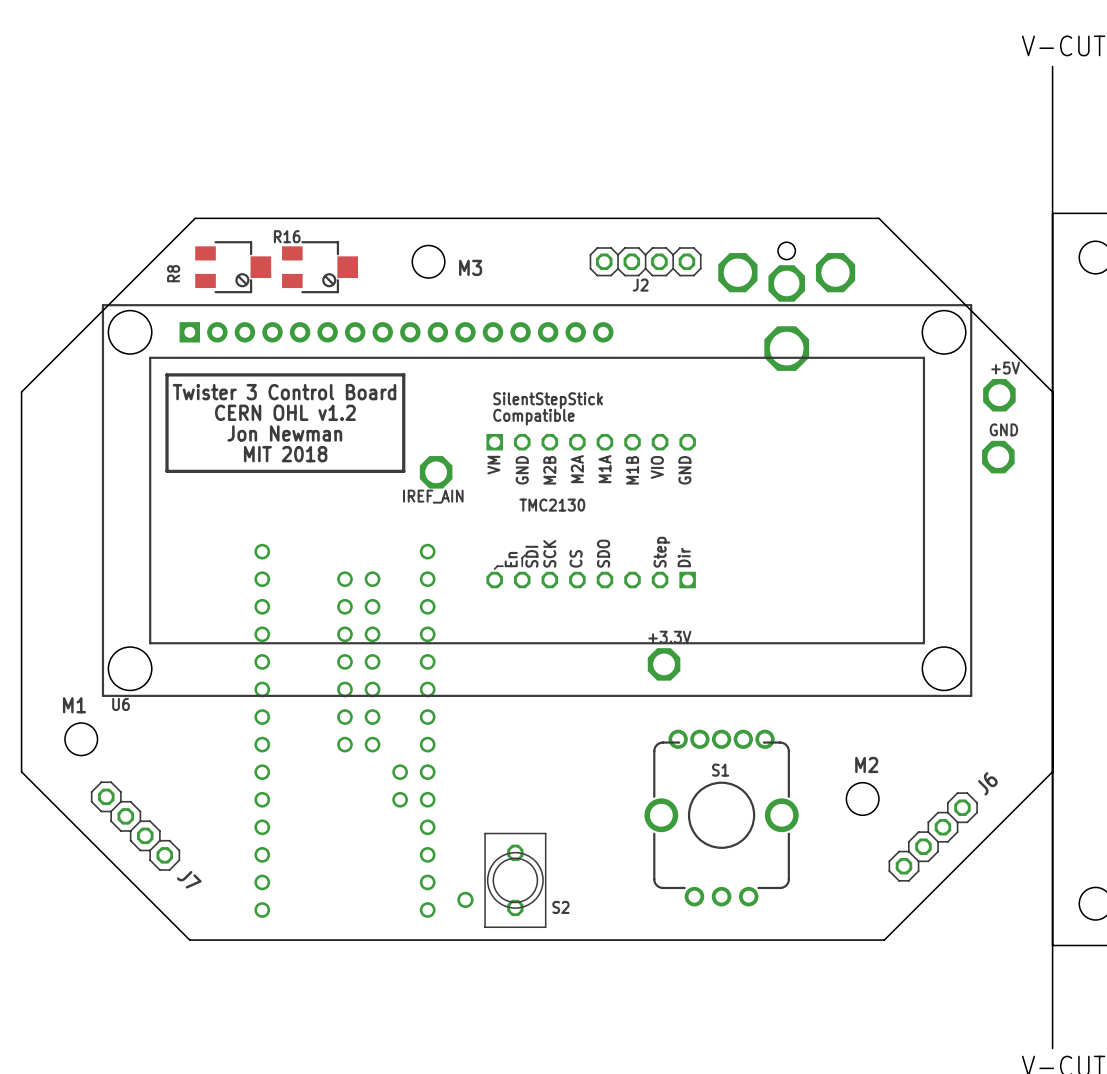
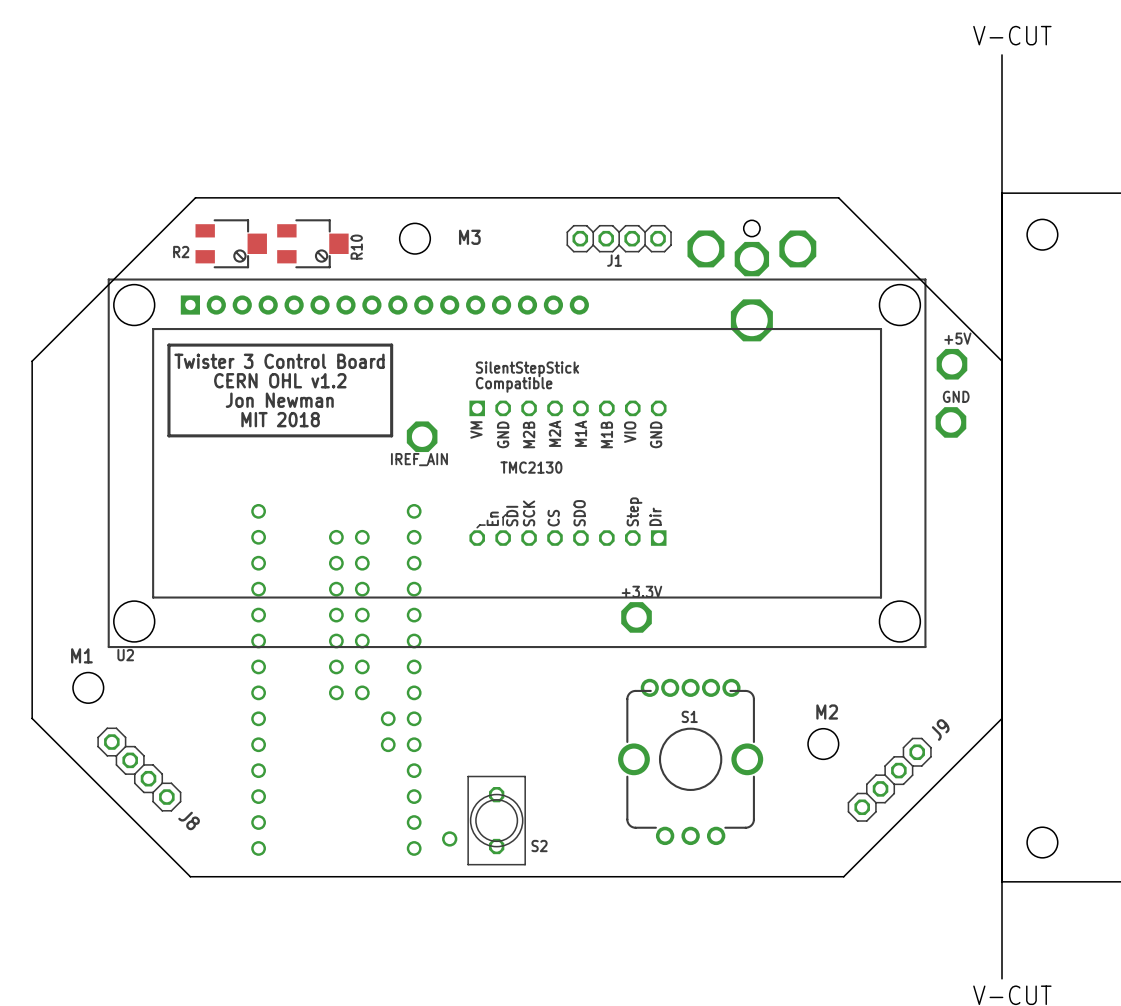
R16 name: R16 (287, 236) -> R10 (356, 247)
text position: M3 (470, 267) -> M3 (469, 237)
R8 name: R8 (173, 273) -> R2 (181, 252)
J2 name: J2 (640, 285) -> J1 (614, 260)
U6 name: U6 (121, 704) -> U2 (125, 655)
J6 name: J6 (987, 783) -> J9 (940, 730)
J7 name: J7 (189, 879) -> J8 (189, 820)

